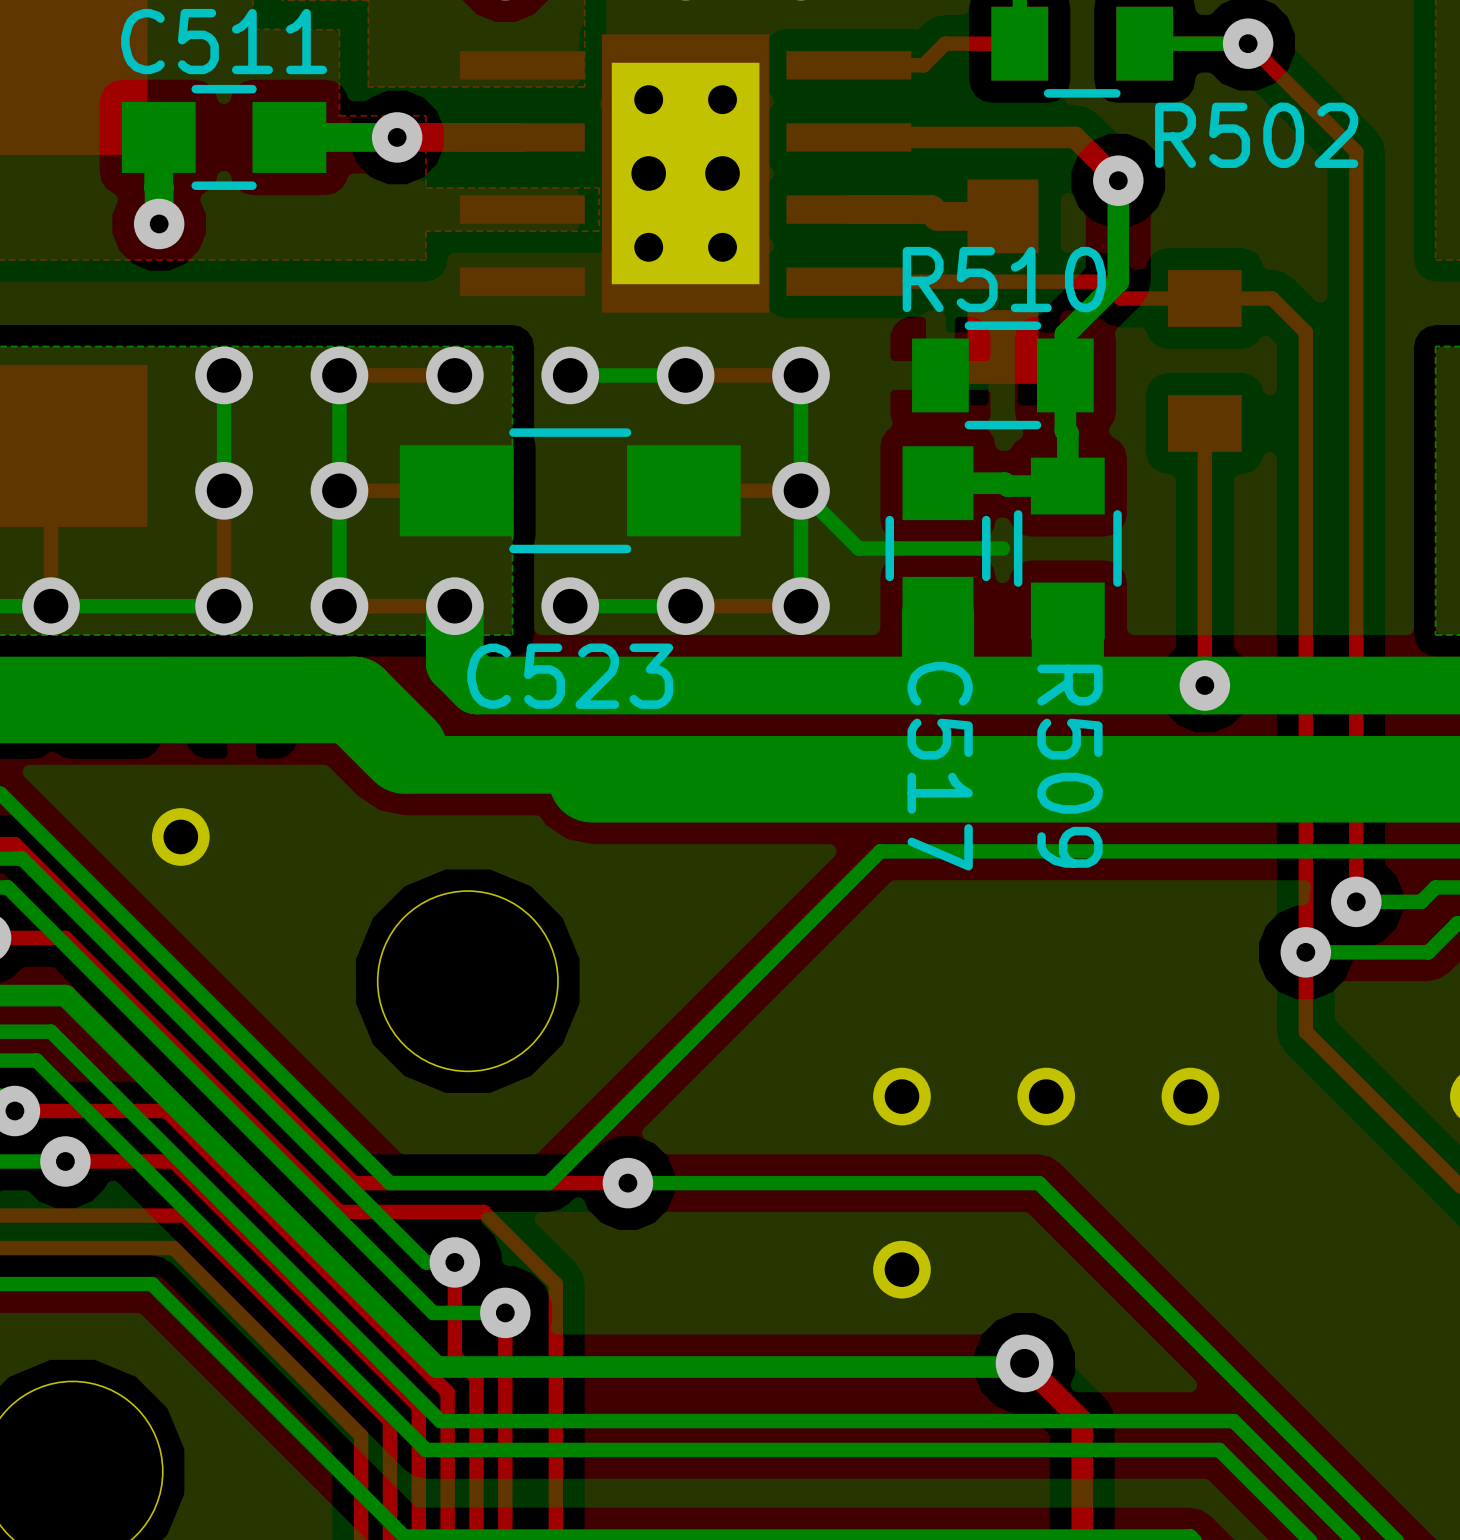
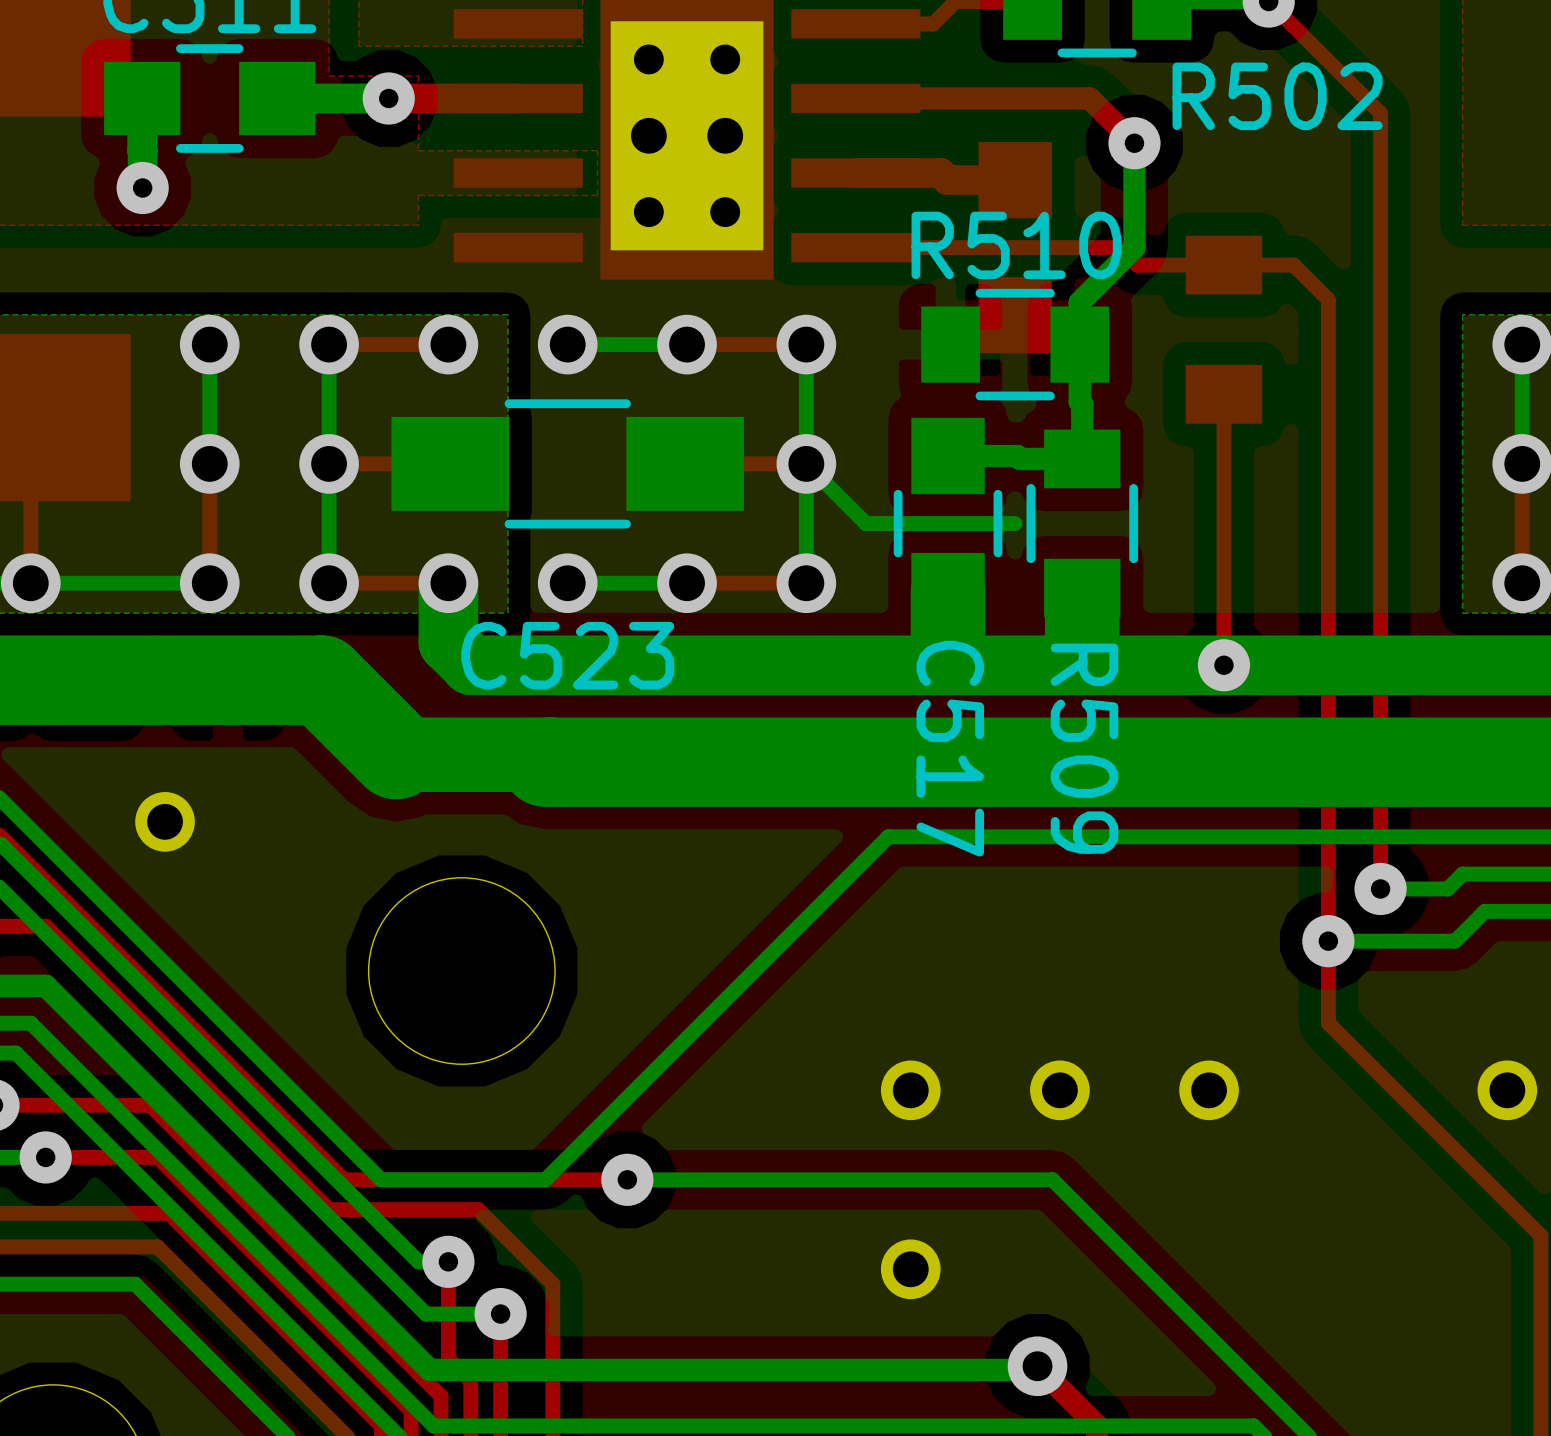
bottom track: (332, 699) (353, 699) (404, 750) (404, 764) (591, 764) (591, 779) -> (321, 680) (396, 754) (552, 754) (545, 762) (590, 762)

